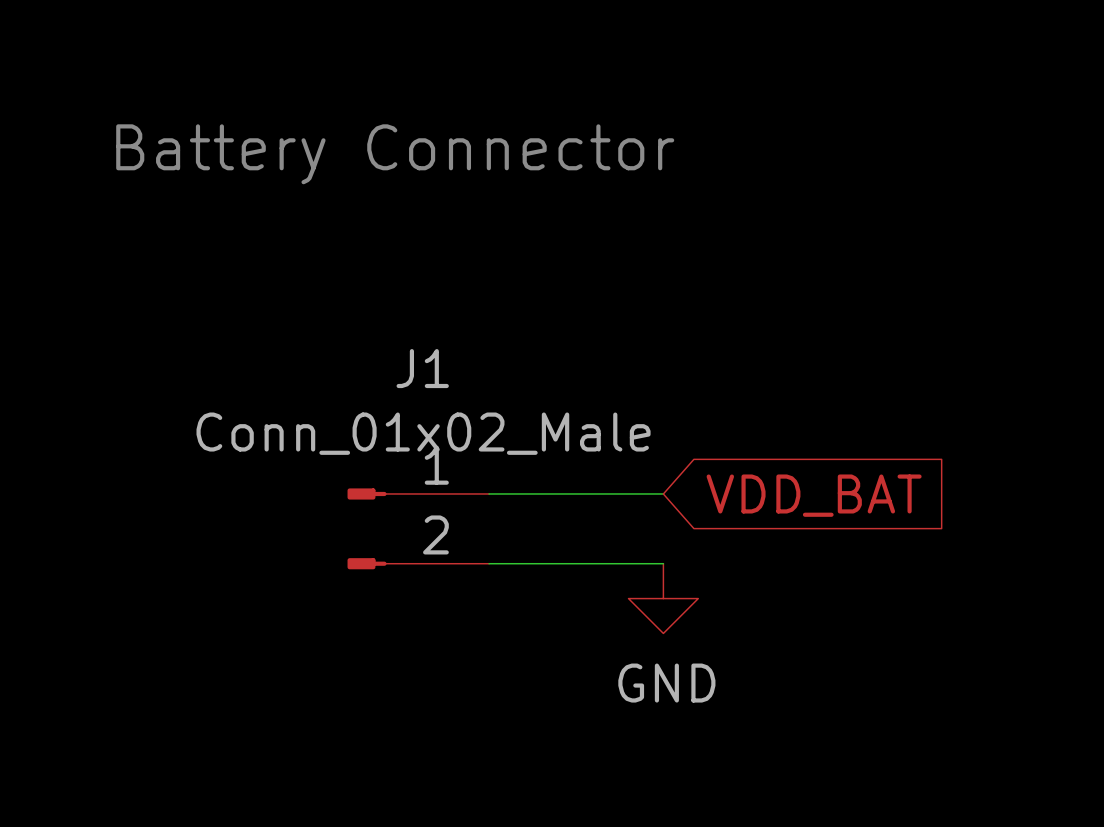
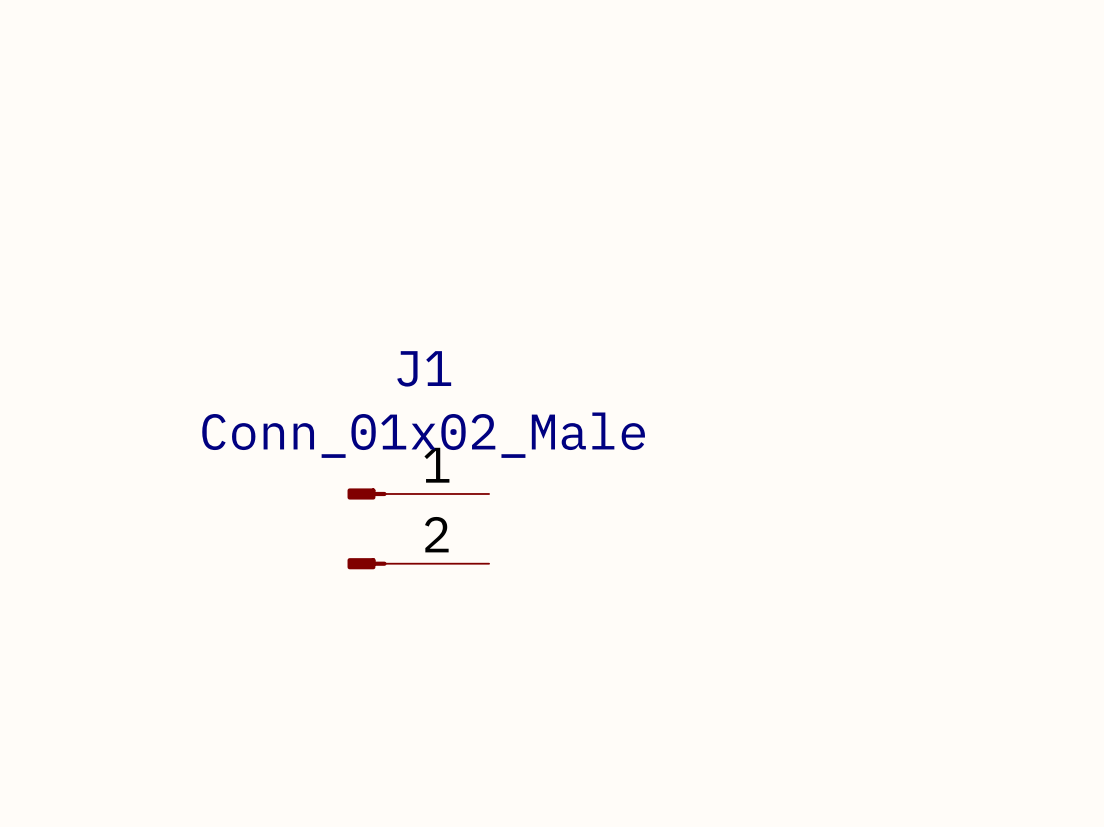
text: Battery Connector (395, 154) -> none
wire: (489, 493) (663, 493) -> none
global label: VDD_BAT (814, 495) -> none
wire: (489, 563) (663, 563) -> none
power symbol: GND (663, 598) -> none

